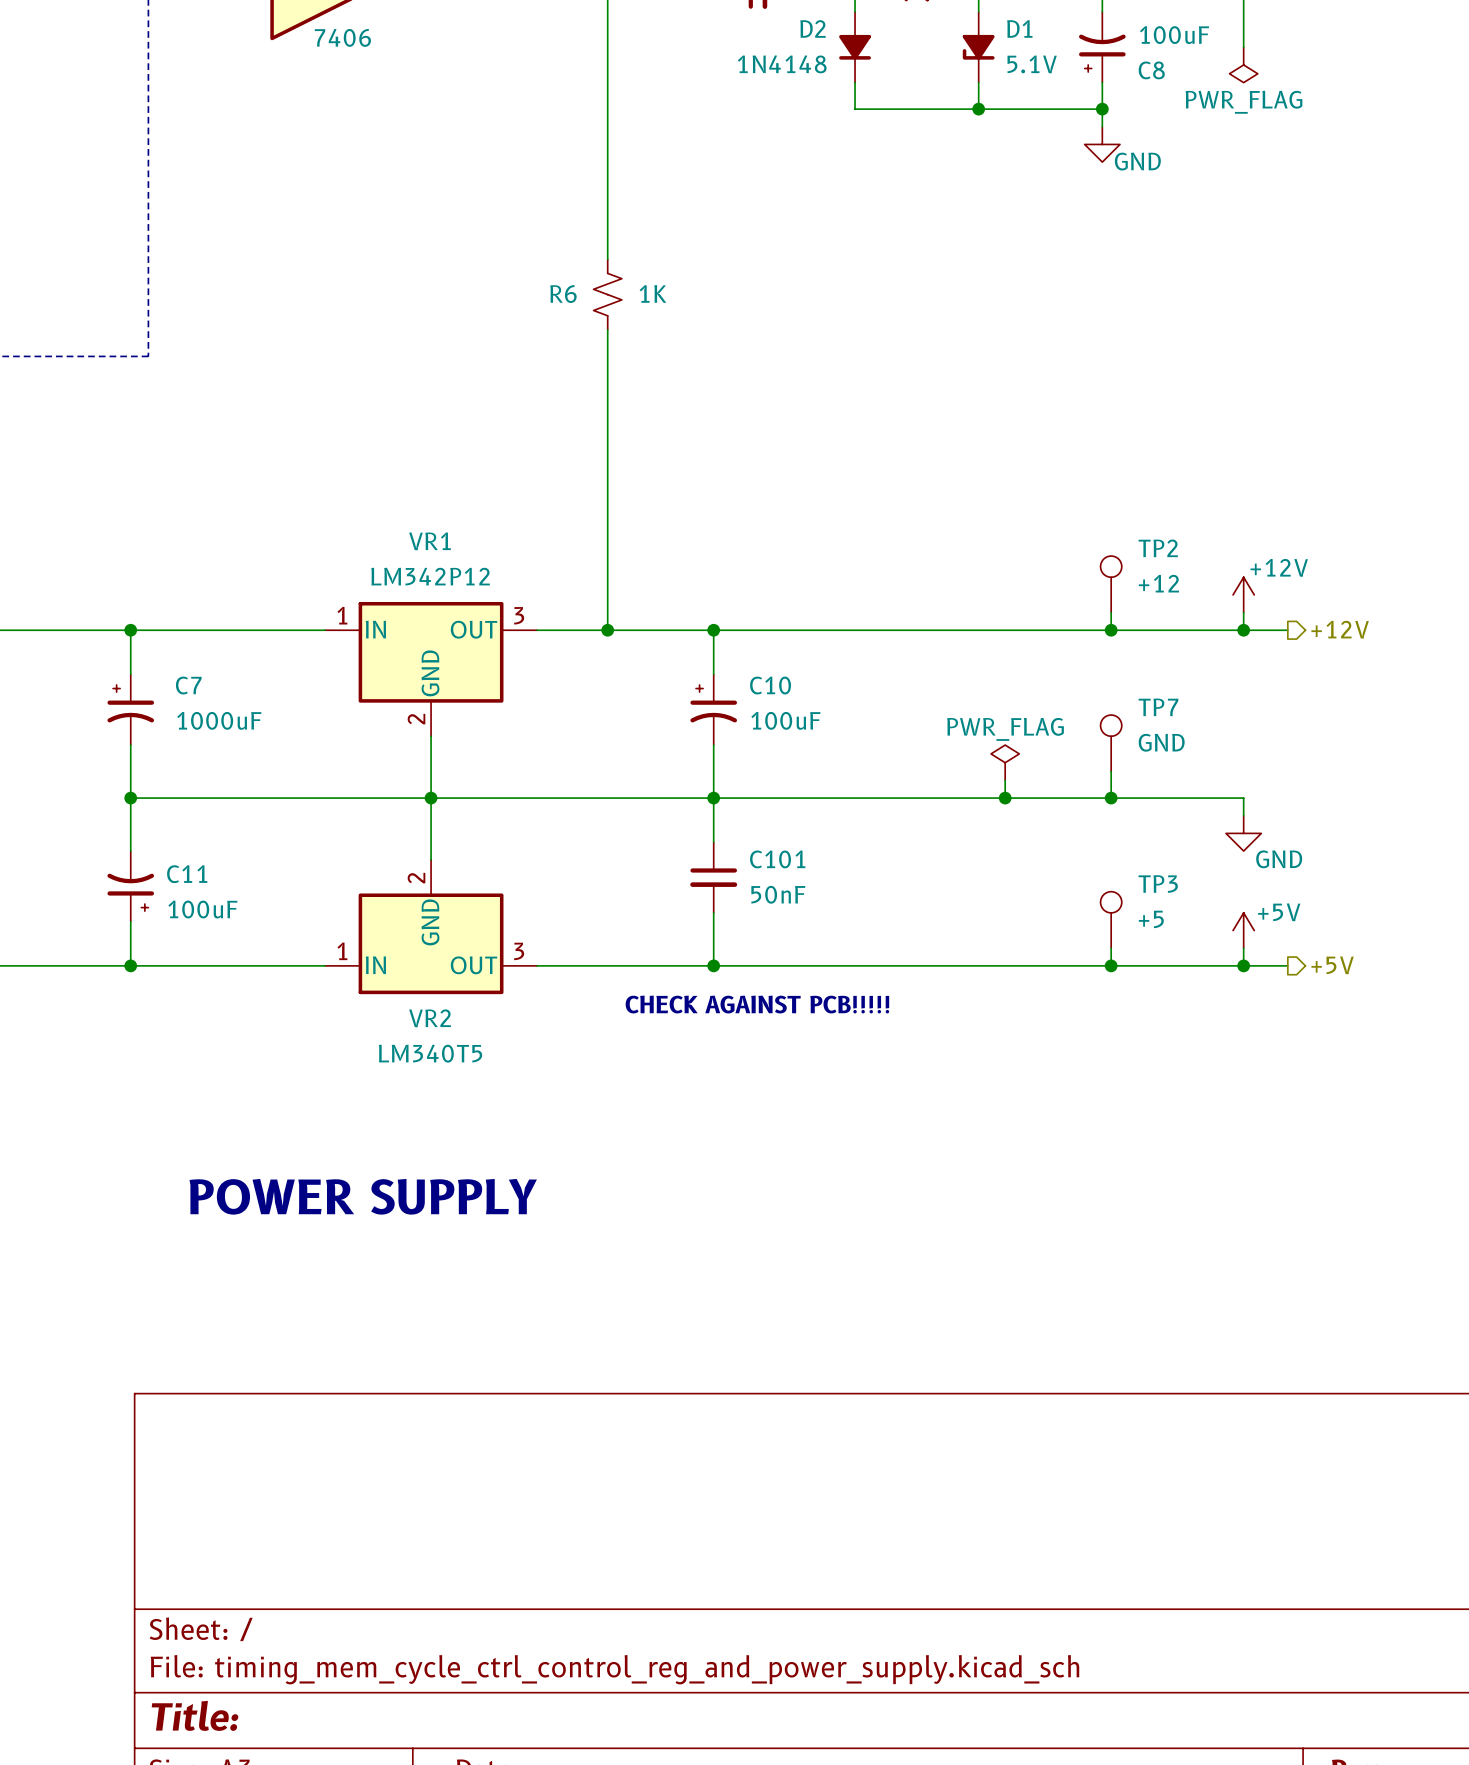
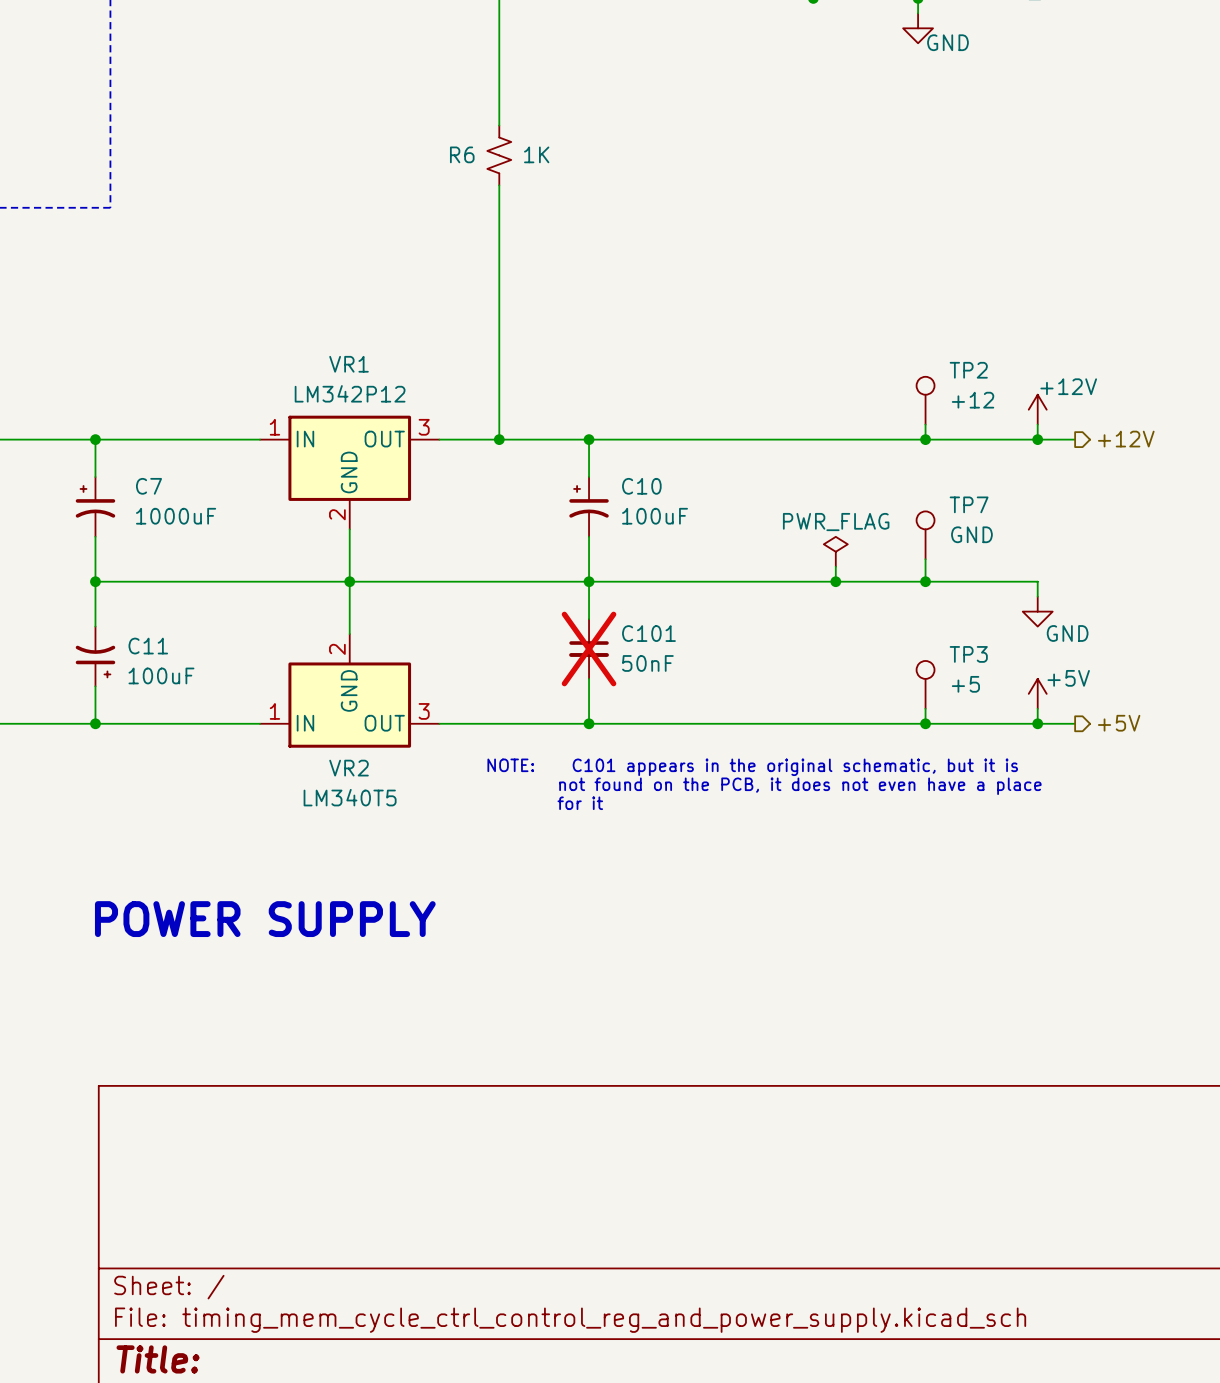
C101 do-not-place cross: none -> (589, 649)
text: CHECK AGAINST PCB!!!!! (757, 1004) -> none
text: none -> NOTE: C101 appears in the original schematic, but it is (752, 767)
text: none -> not found on the PCB, it does not even have a place (800, 786)
text: none -> for it (580, 803)

